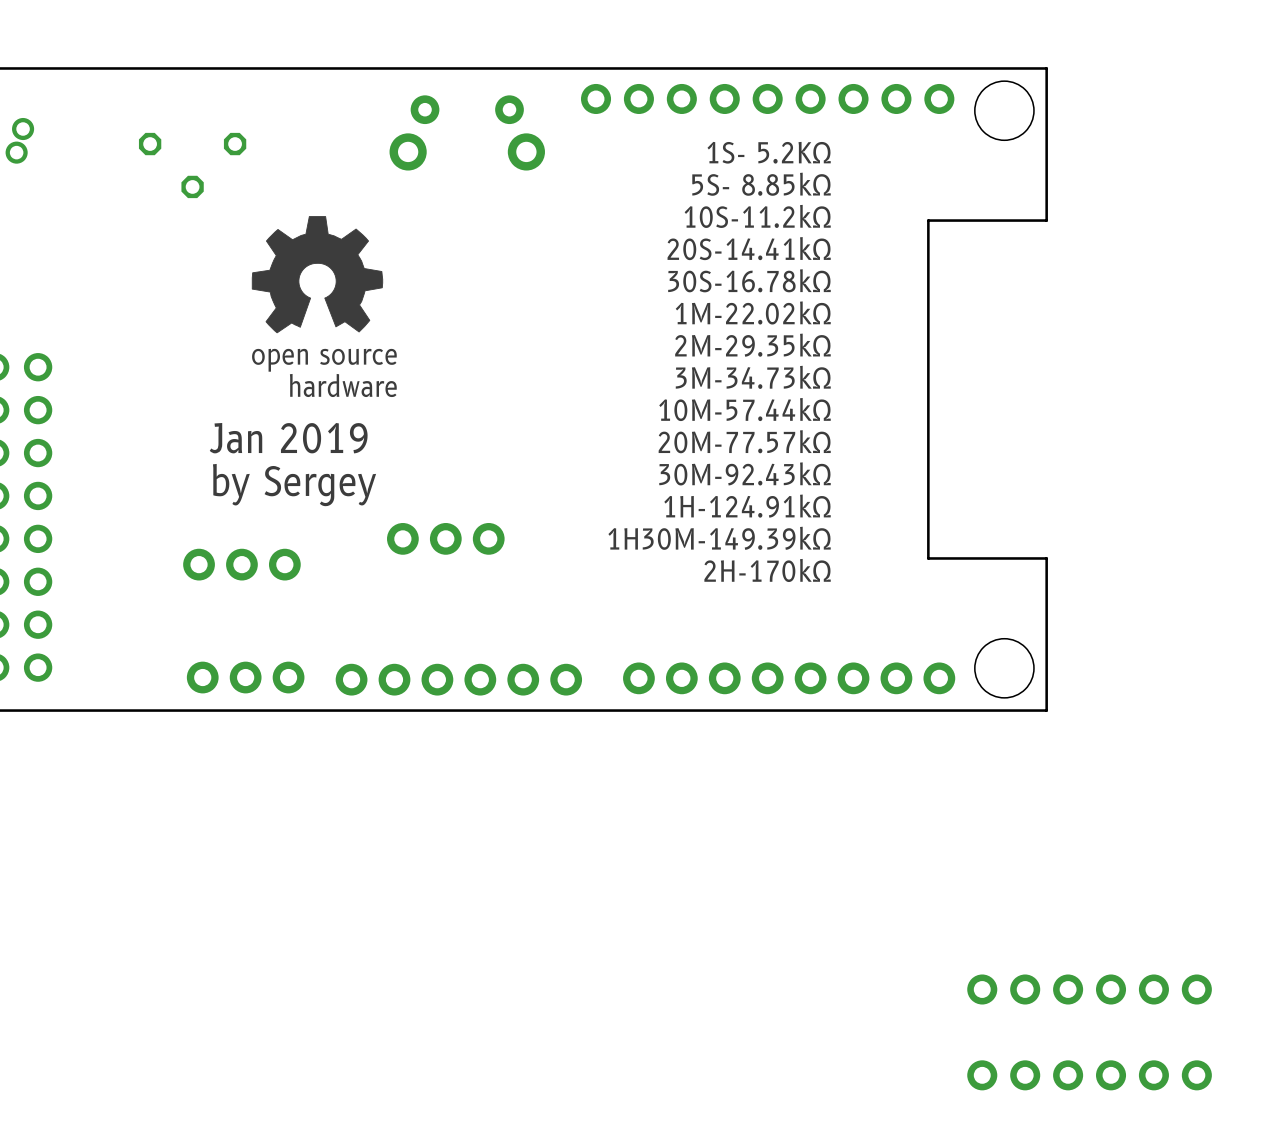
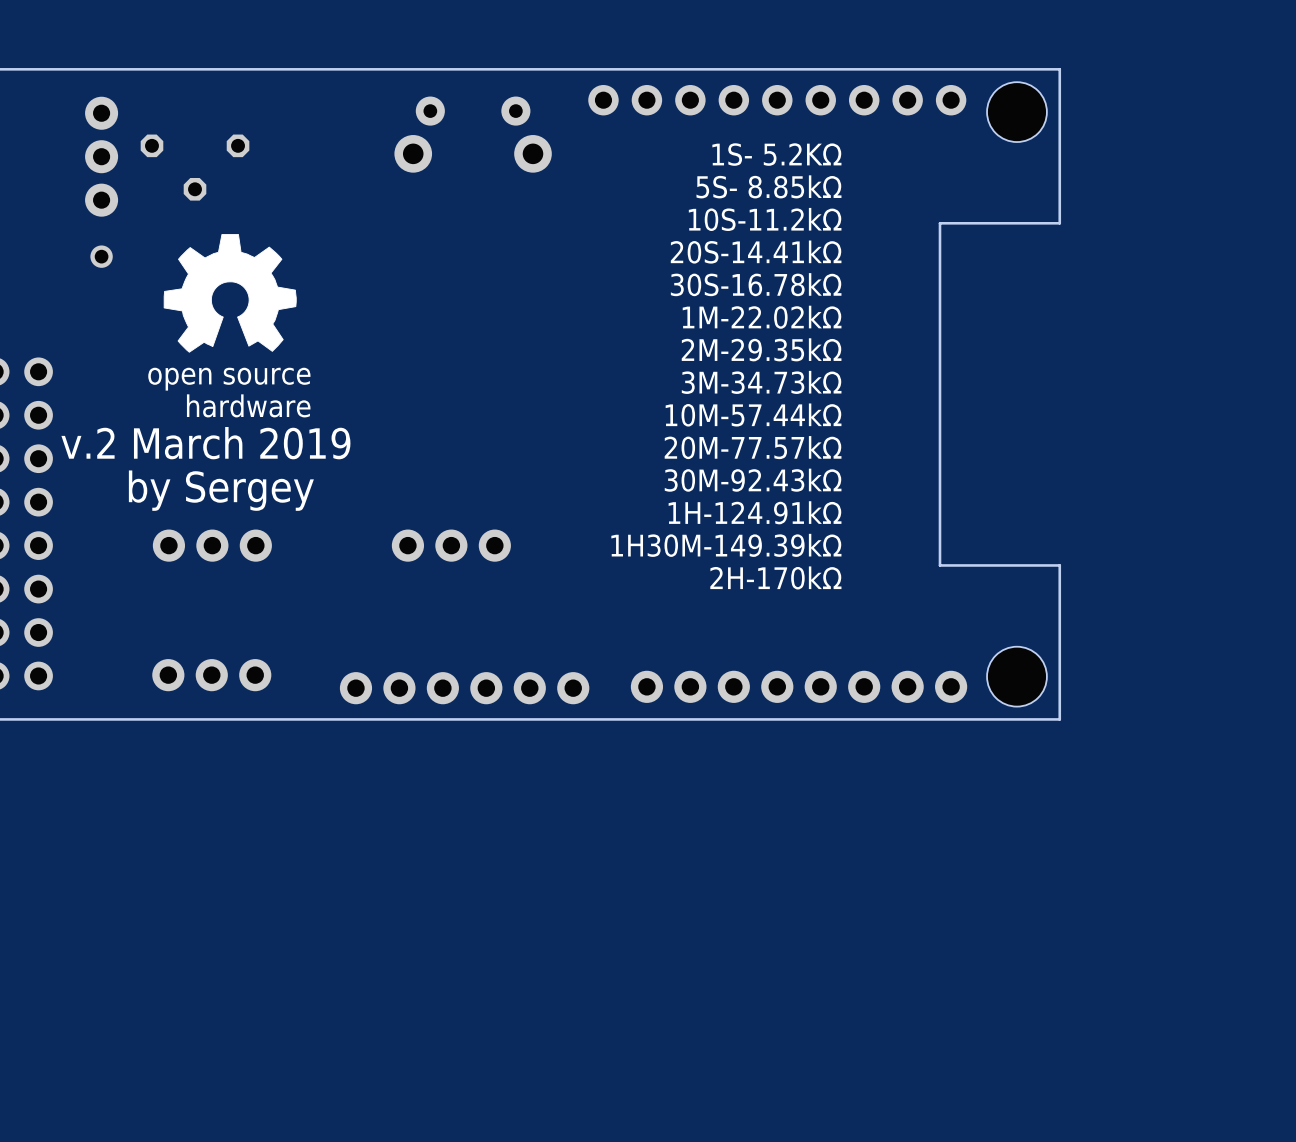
part: (23, 129) -> none
part: (16, 152) -> none
part: none -> (101, 156)
part: none -> (101, 256)
drawing position: (317, 274) -> (230, 293)
text: none -> v.2 March 2019 (205, 443)
text: Jan 2019 (288, 438) -> none
text position: by Sergey (294, 485) -> by Sergey (221, 490)
part position: (241, 564) -> (212, 545)
part position: (245, 677) -> (211, 675)
part: (1089, 989) -> none
part: (1089, 1075) -> none

